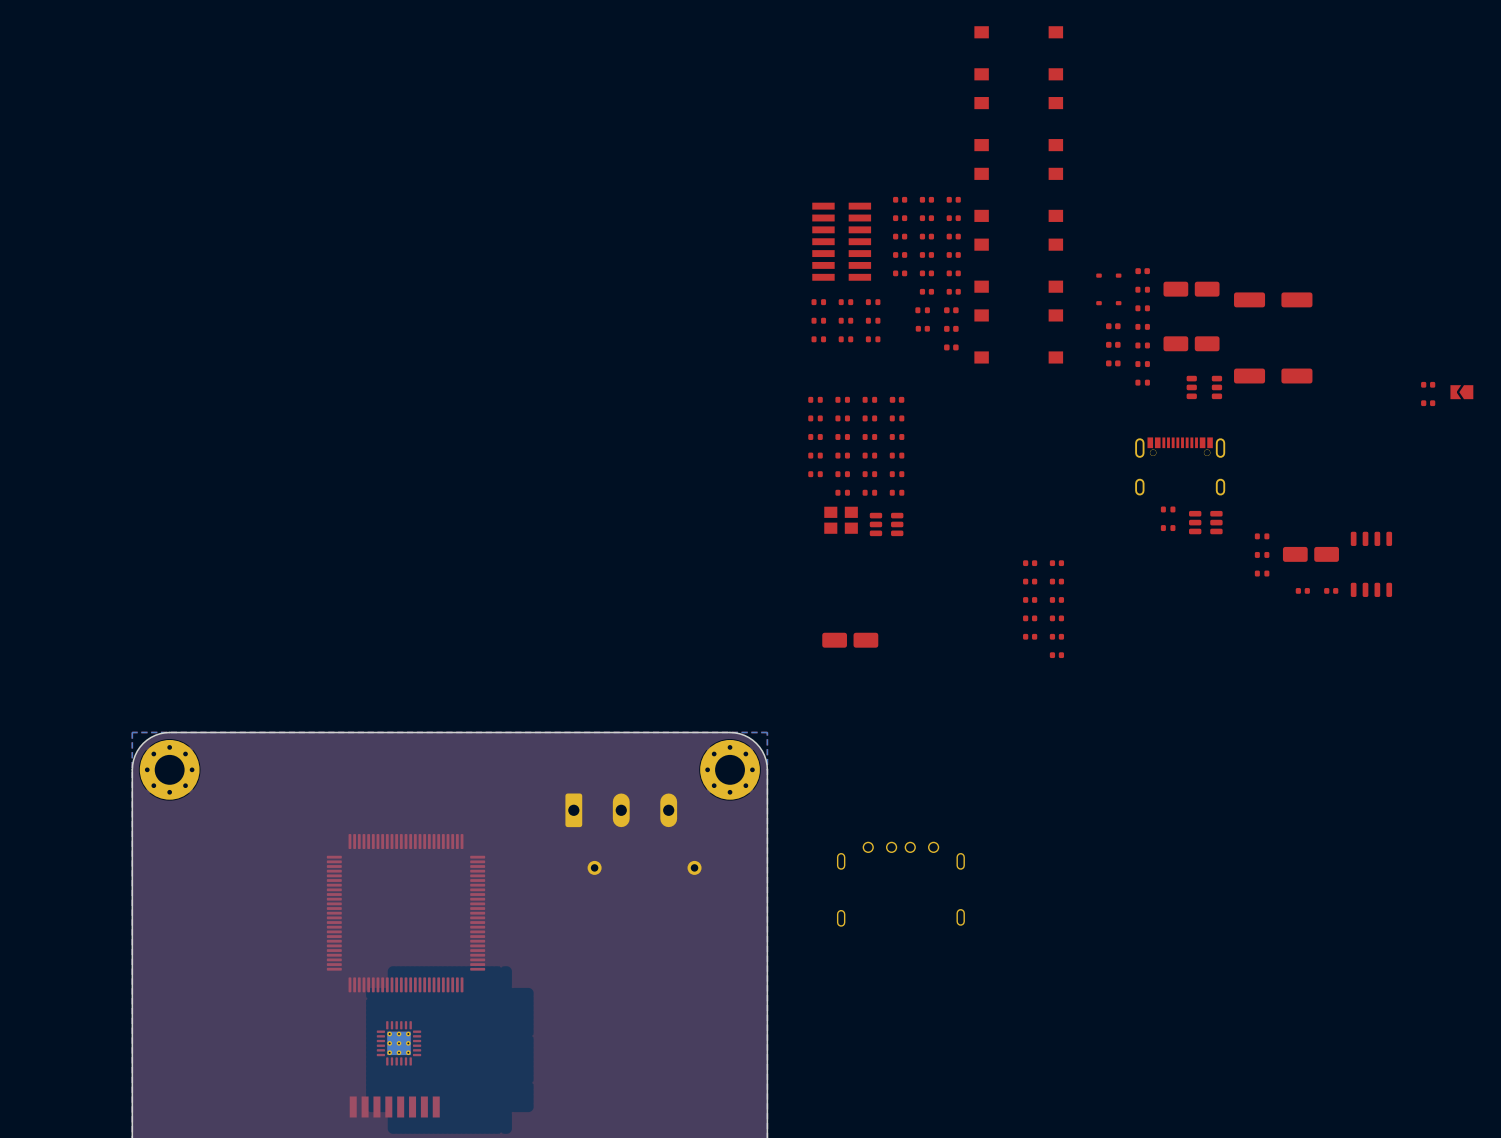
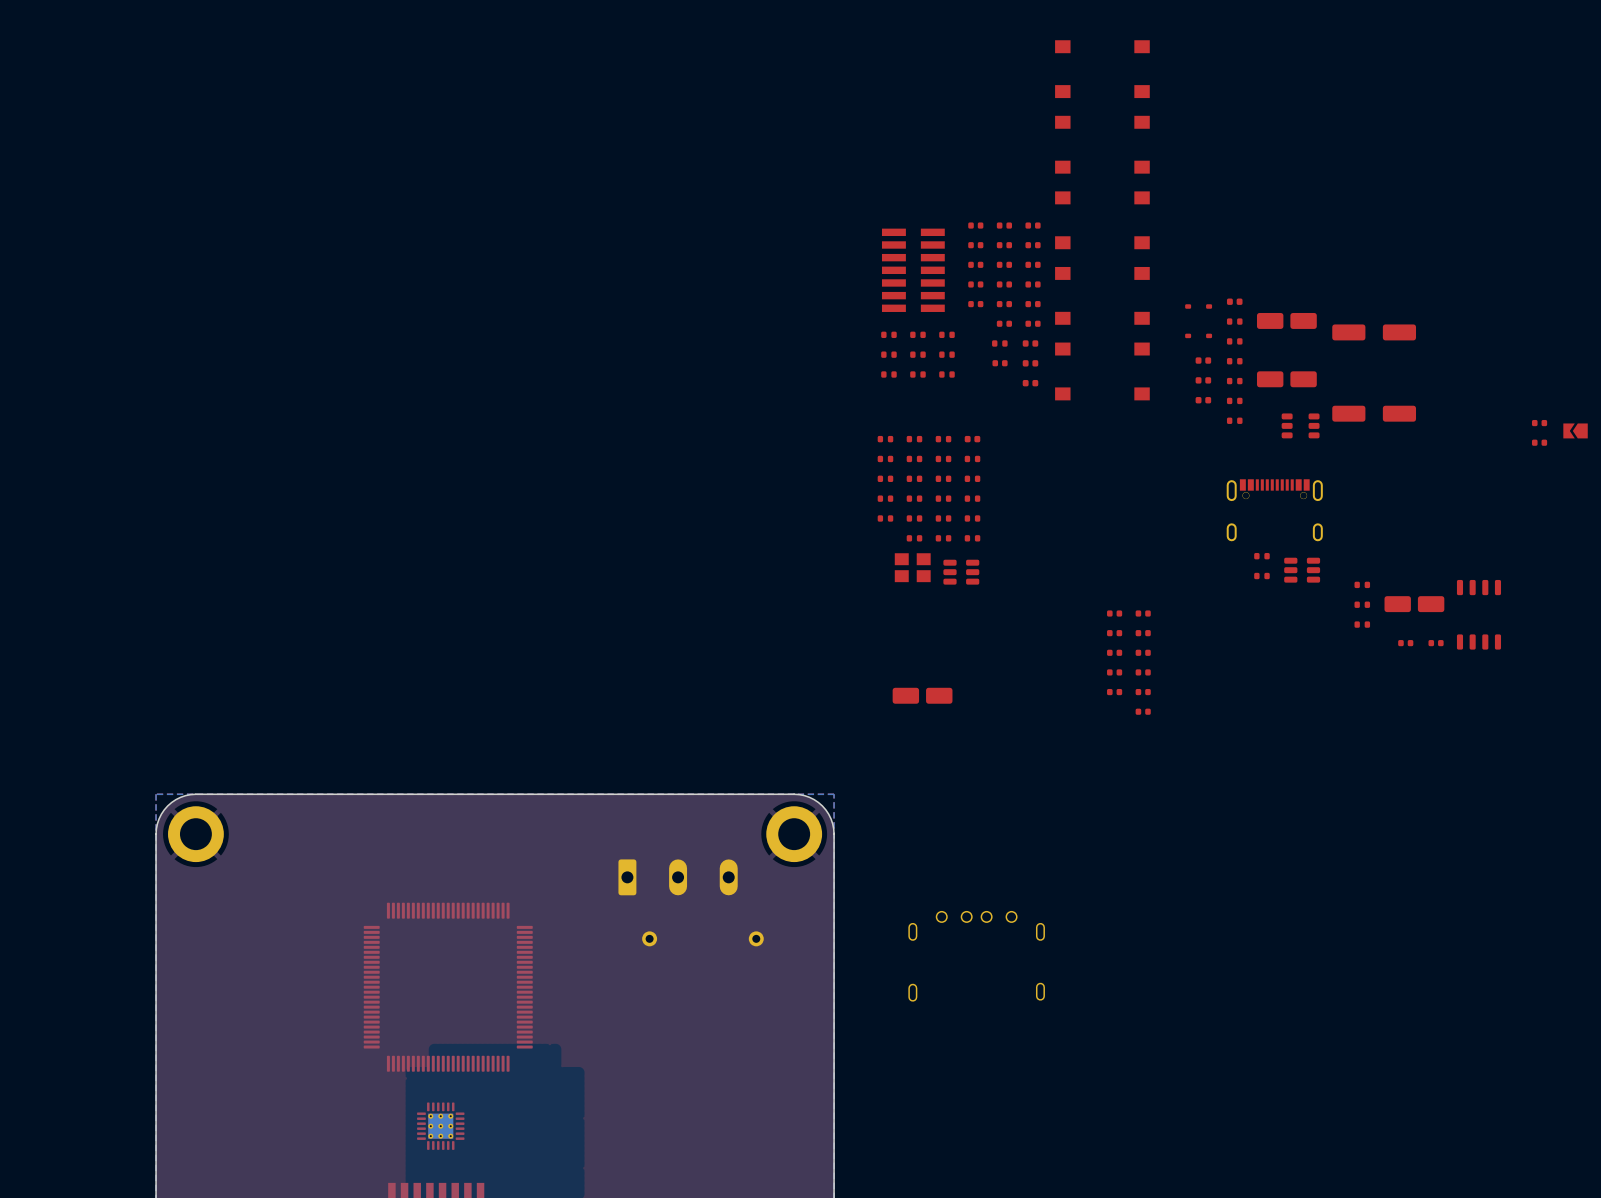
part footprint: [139, 739, 200, 800] -> [168, 806, 224, 863]
part footprint: [700, 739, 760, 800] -> [766, 806, 823, 863]

